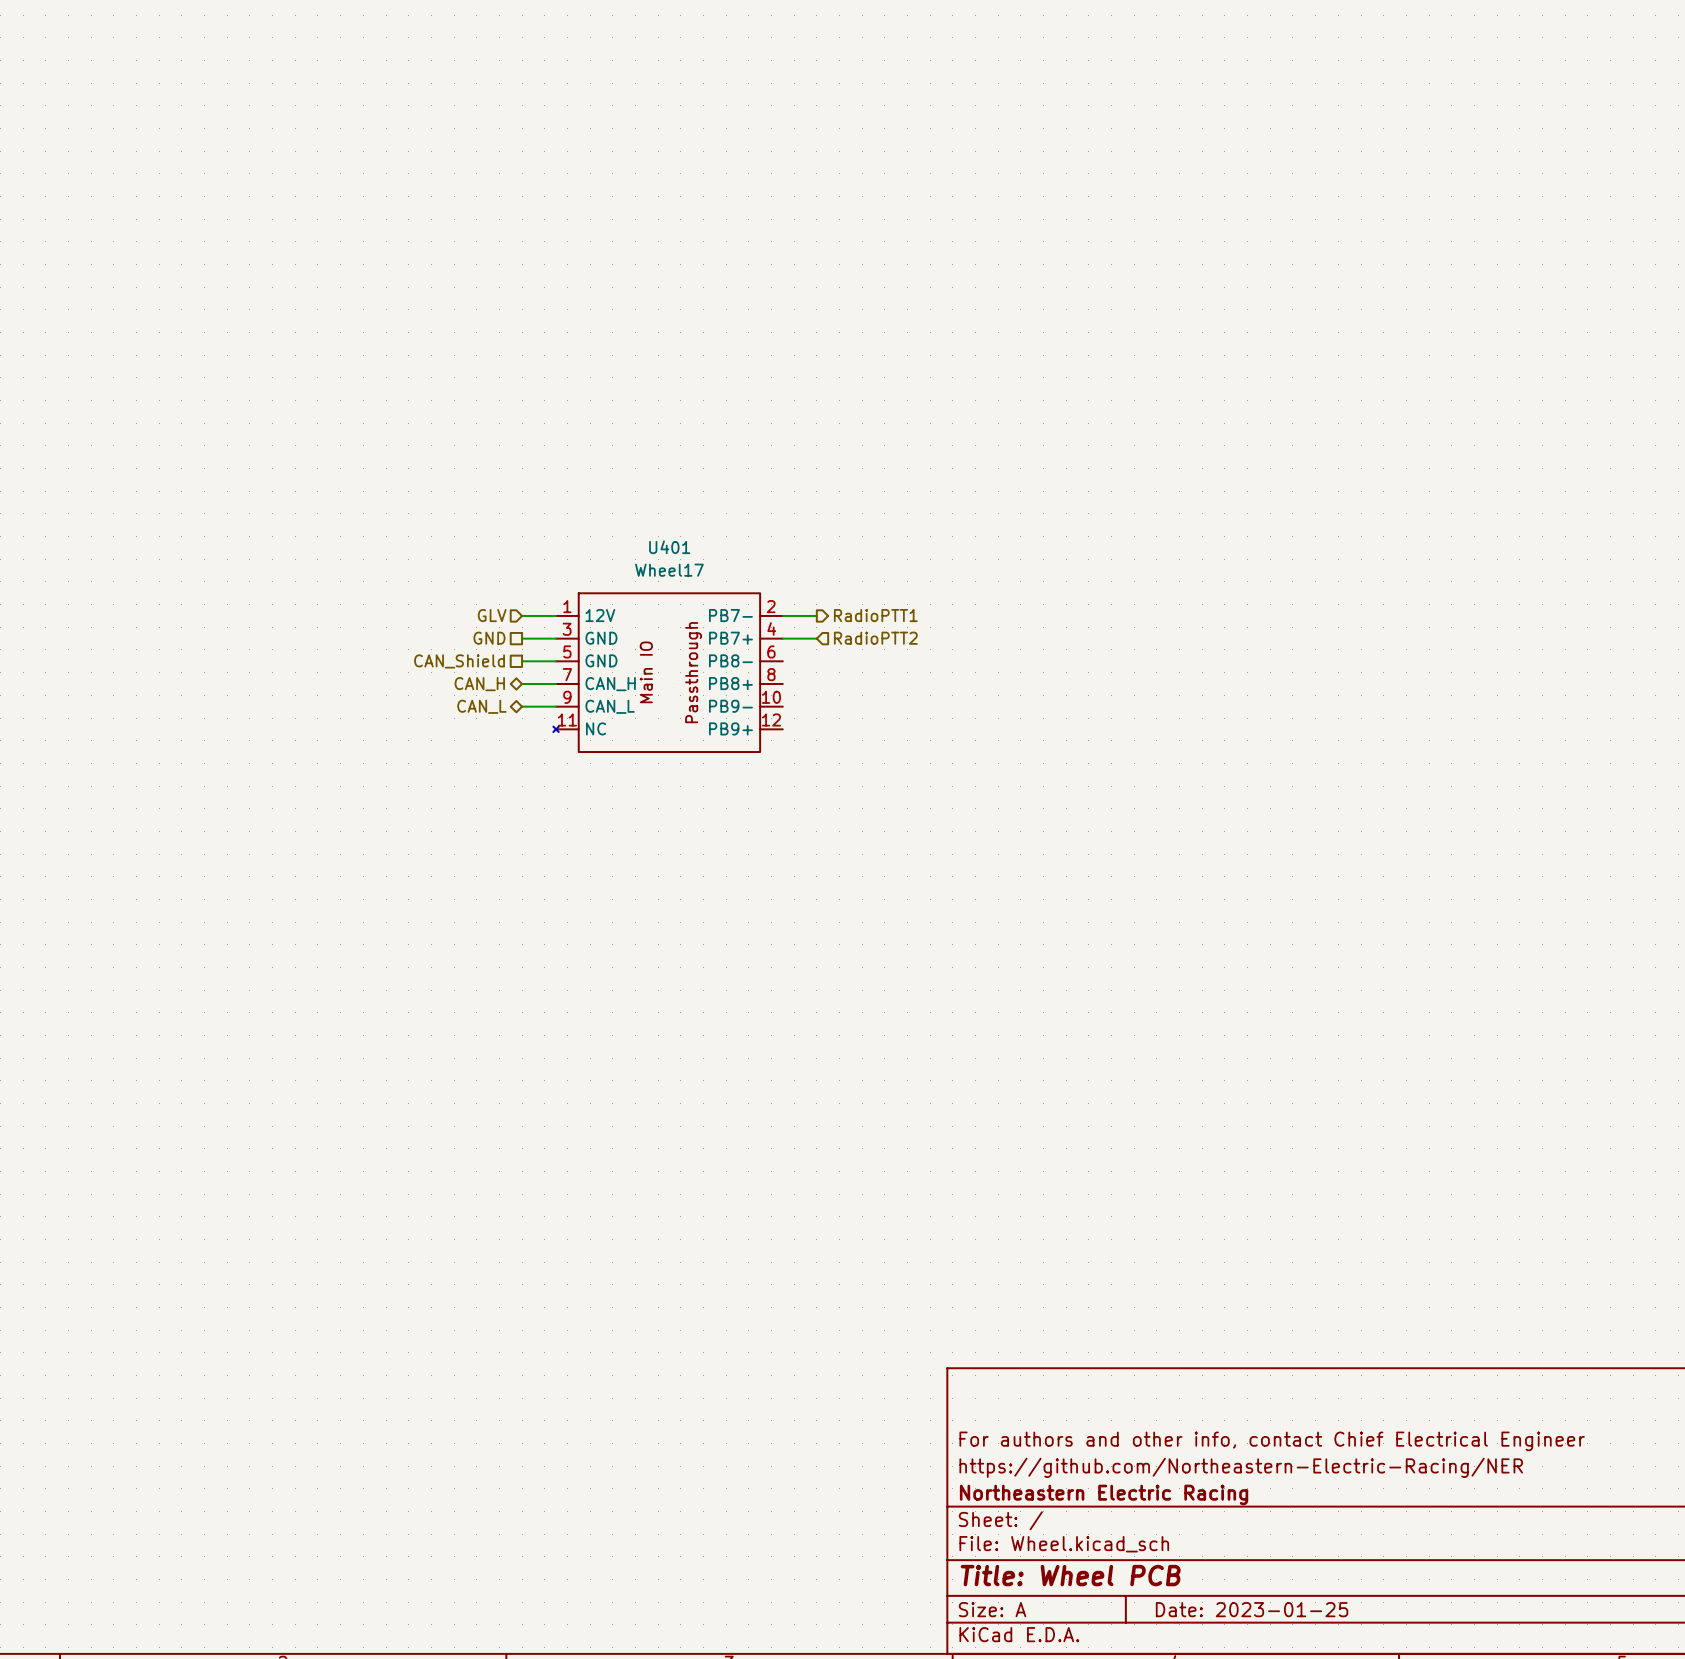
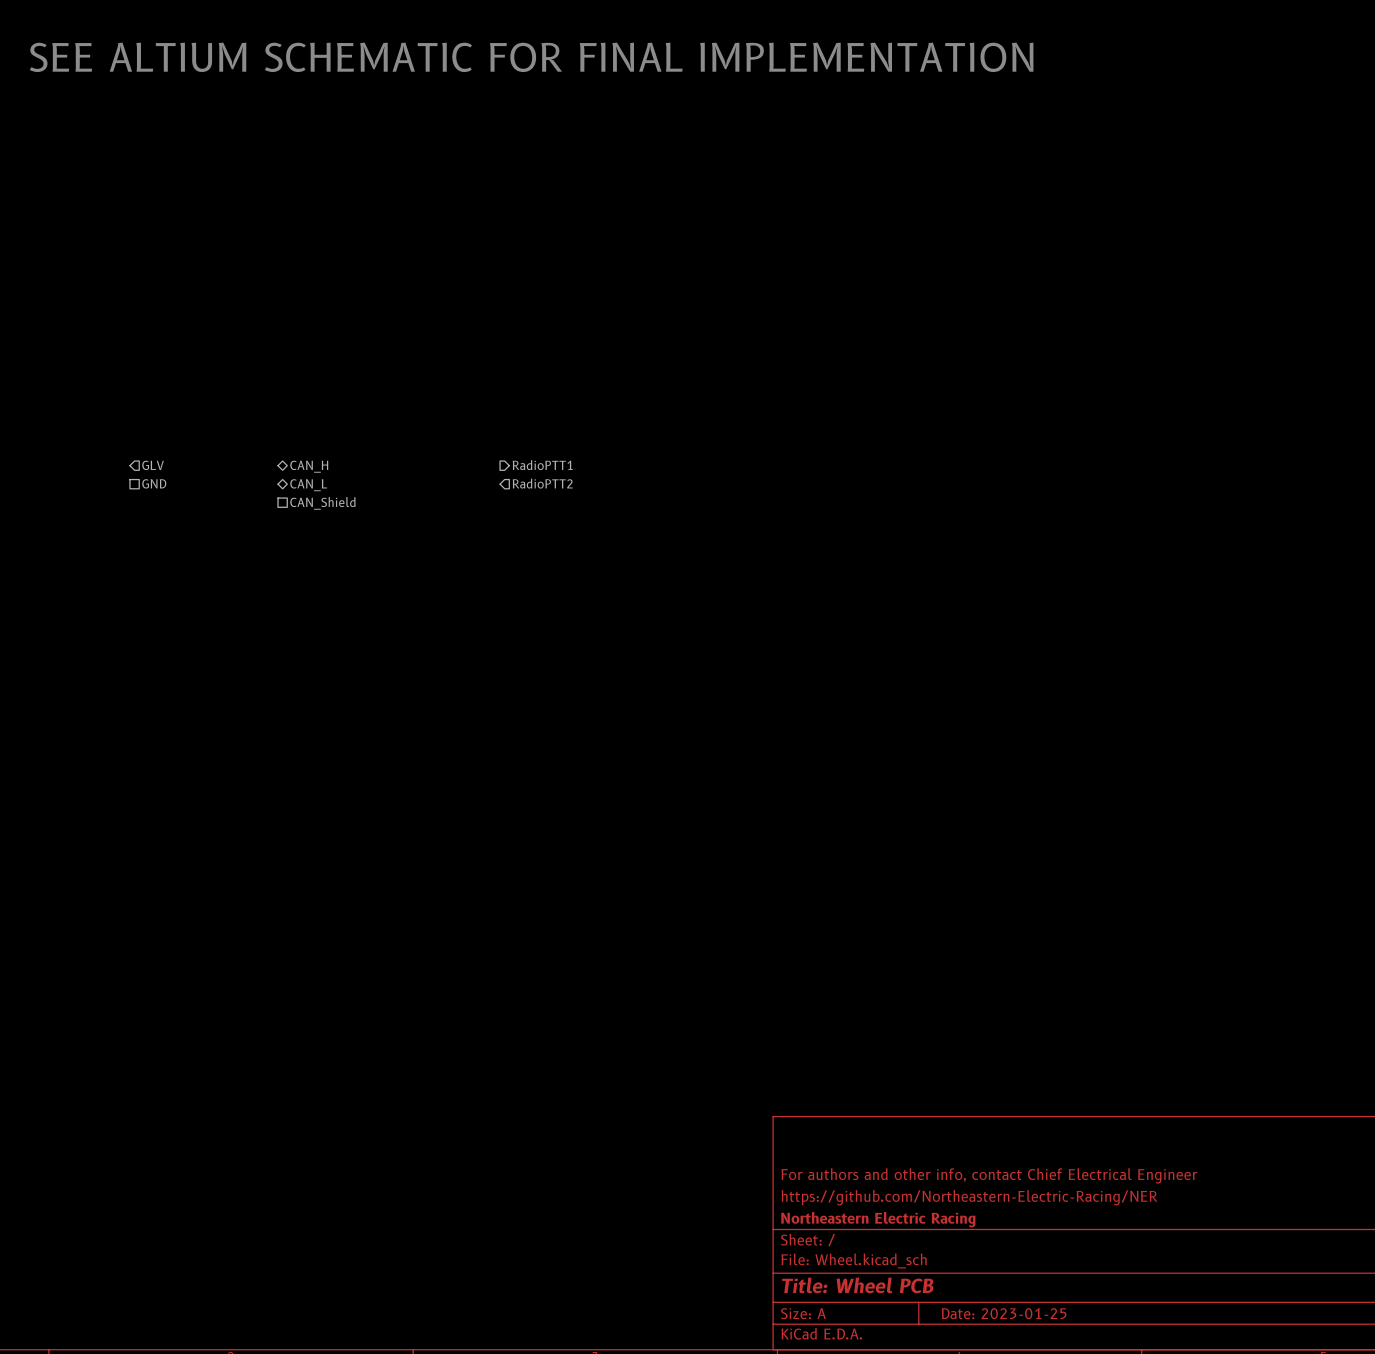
text: none -> SEE ALTIUM SCHEMATIC FOR FINAL IMPLEMENTATION (531, 57)
hierarchical label: none -> GLV (153, 465)
hierarchical label: none -> GND (154, 483)
hierarchical label: GLV (492, 615) -> none
wire: (522, 615) (556, 615) -> none
wire: (782, 615) (816, 615) -> none
hierarchical label position: RadioPTT1 (875, 615) -> RadioPTT1 (542, 465)
hierarchical label: GND (489, 638) -> none
wire: (522, 638) (556, 638) -> none
wire: (782, 638) (816, 638) -> none
hierarchical label position: RadioPTT2 (875, 638) -> RadioPTT2 (542, 483)
hierarchical label rotation: 0° (459, 661) -> 180° (322, 503)
wire: (522, 661) (556, 661) -> none
U401: Wheel17 (668, 672) -> none
wire: (522, 683) (556, 683) -> none
hierarchical label rotation: 0° (479, 684) -> 180° (309, 466)
hierarchical label position: CAN_H (479, 684) -> CAN_H (309, 466)
hierarchical label rotation: 0° (481, 706) -> 180° (308, 485)
hierarchical label position: CAN_L (481, 706) -> CAN_L (308, 485)
wire: (522, 706) (556, 706) -> none

